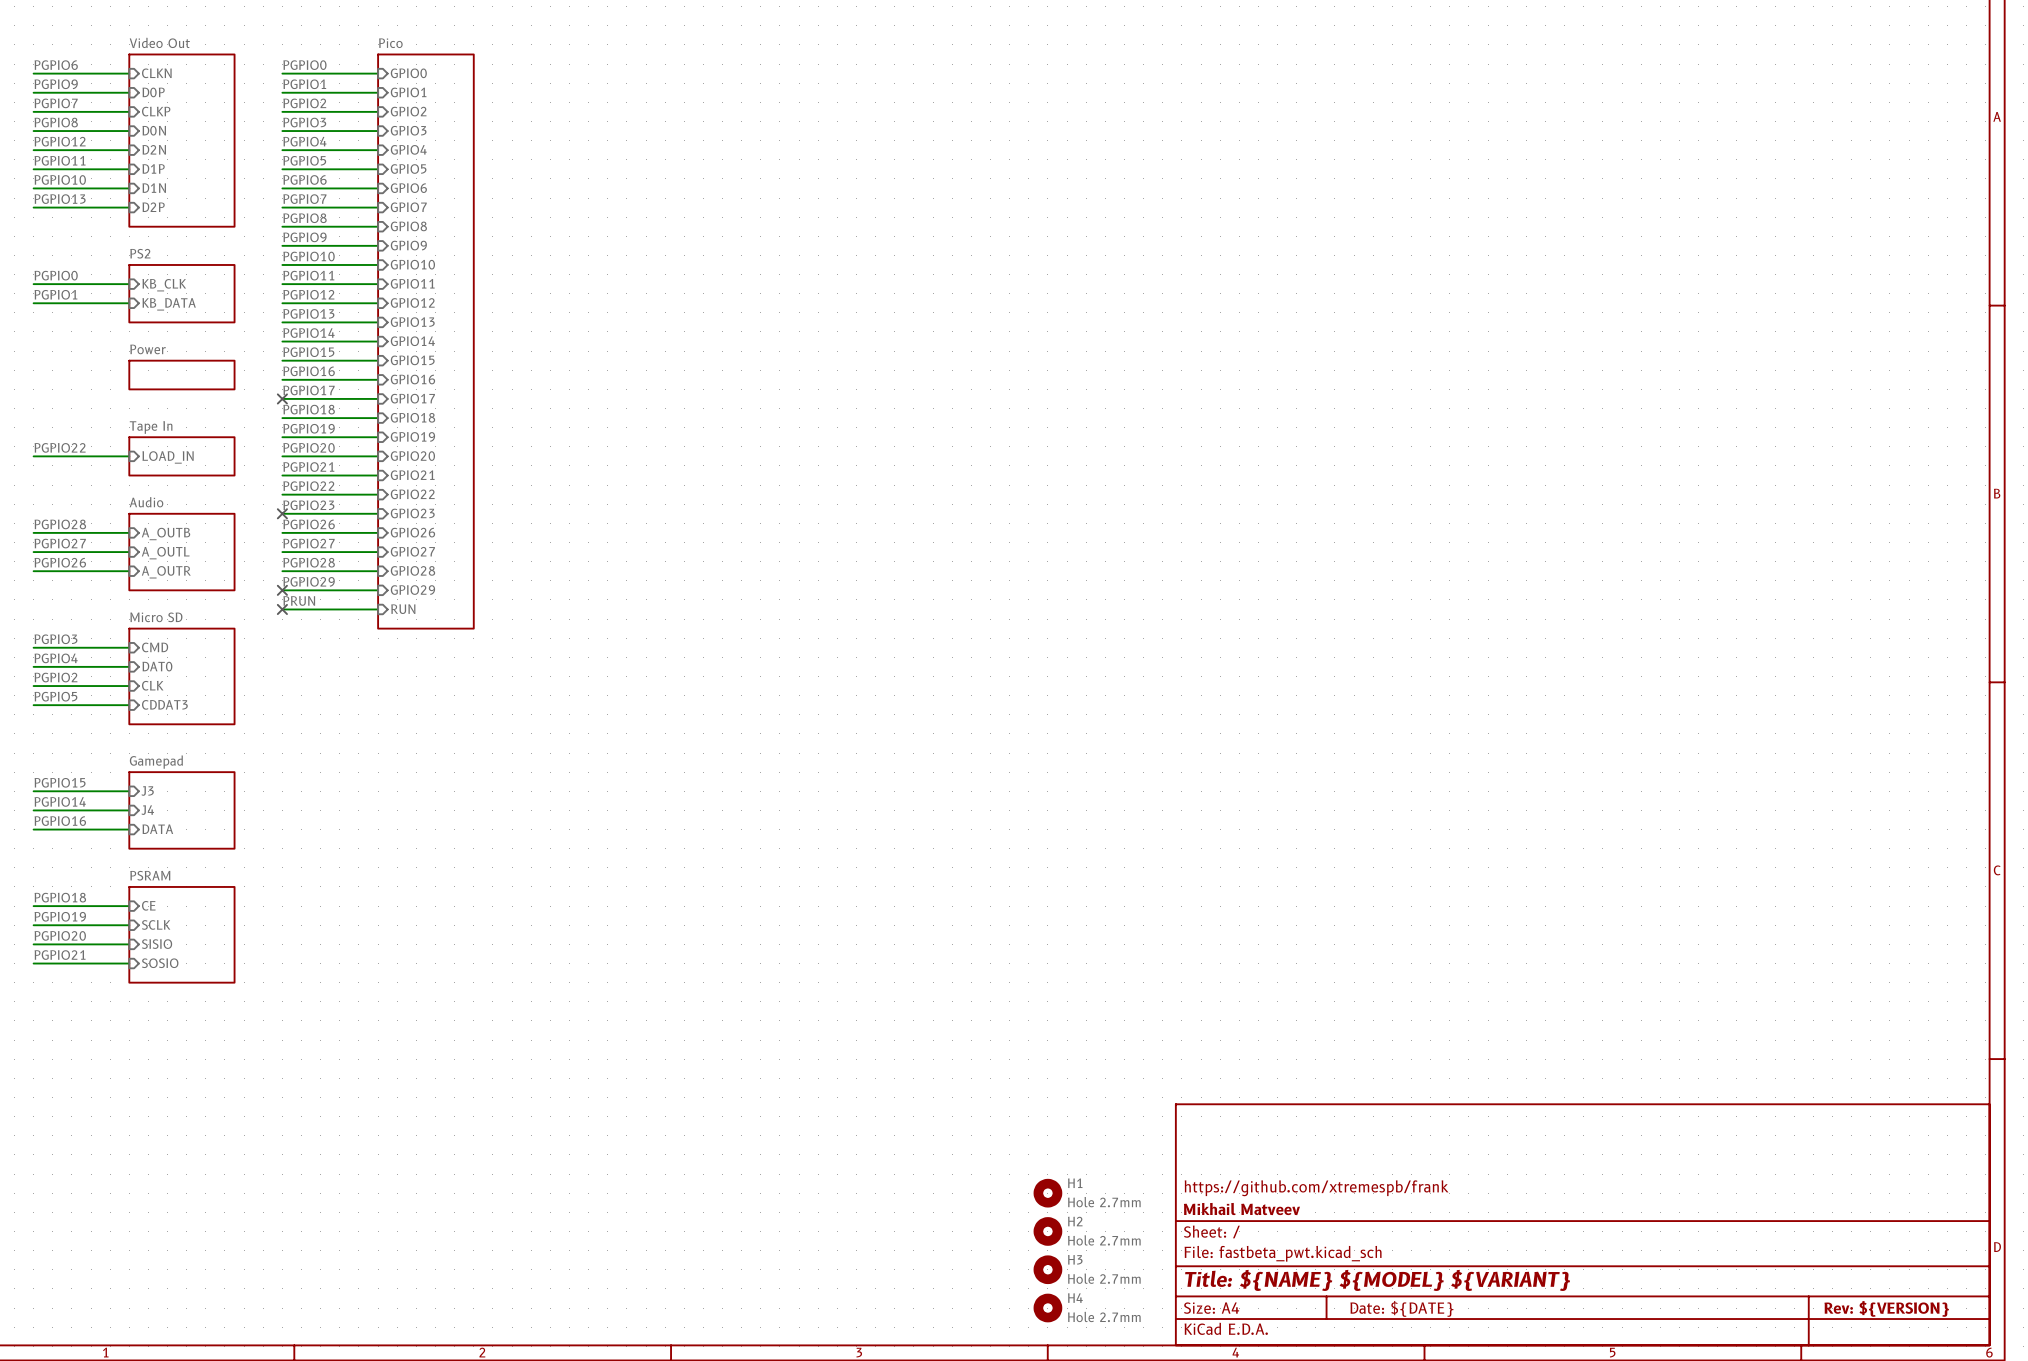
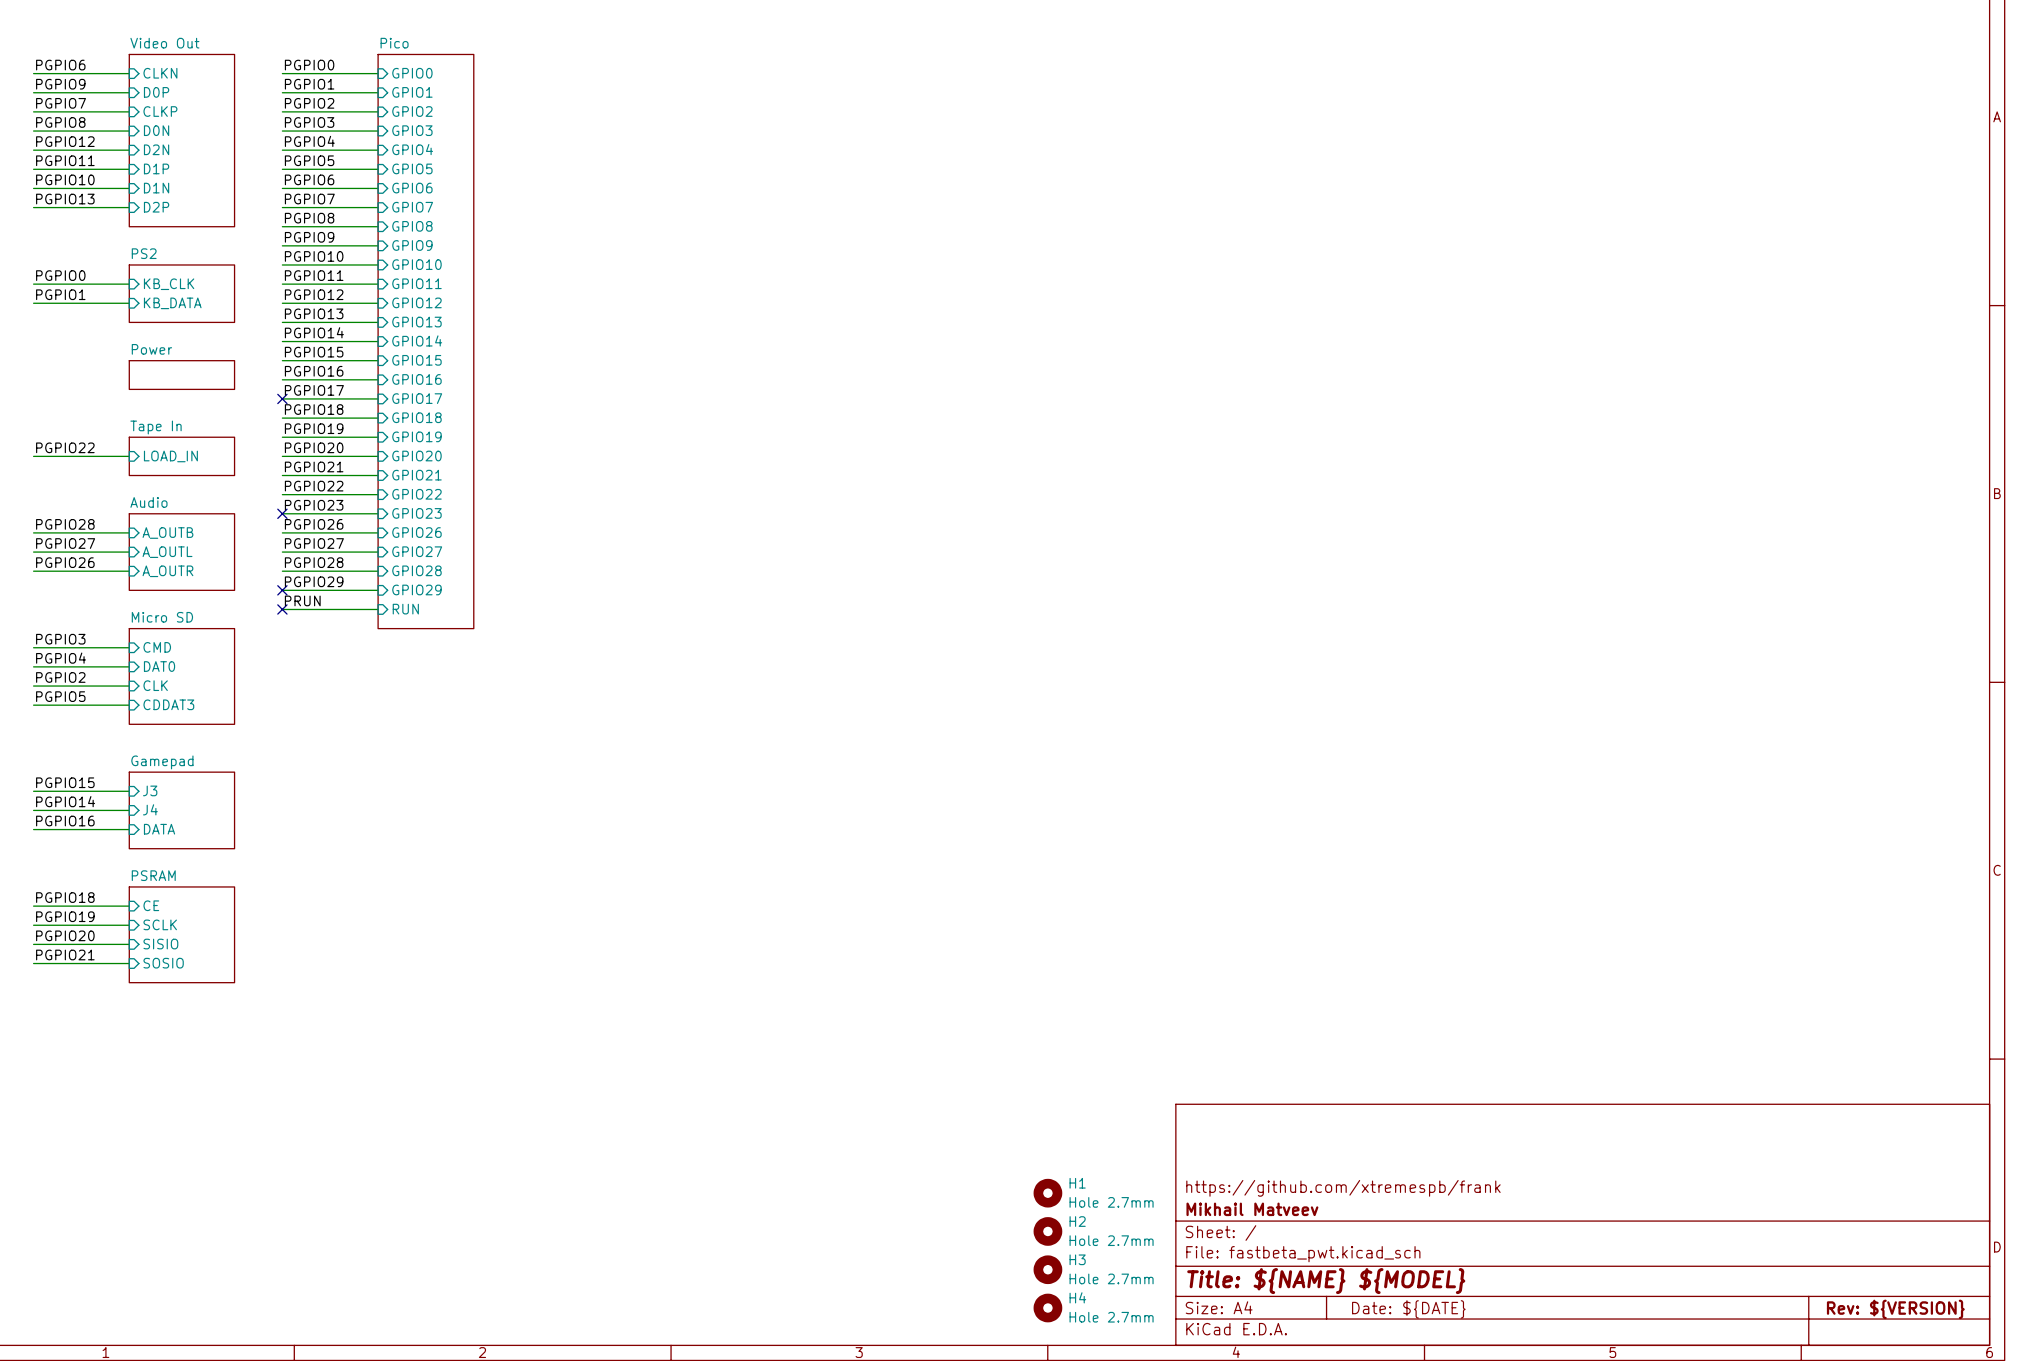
title block: Title: ${NAME} ${MODEL} ${VARIANT} (1377, 1280) -> Title: ${NAME} ${MODEL} (1326, 1281)

